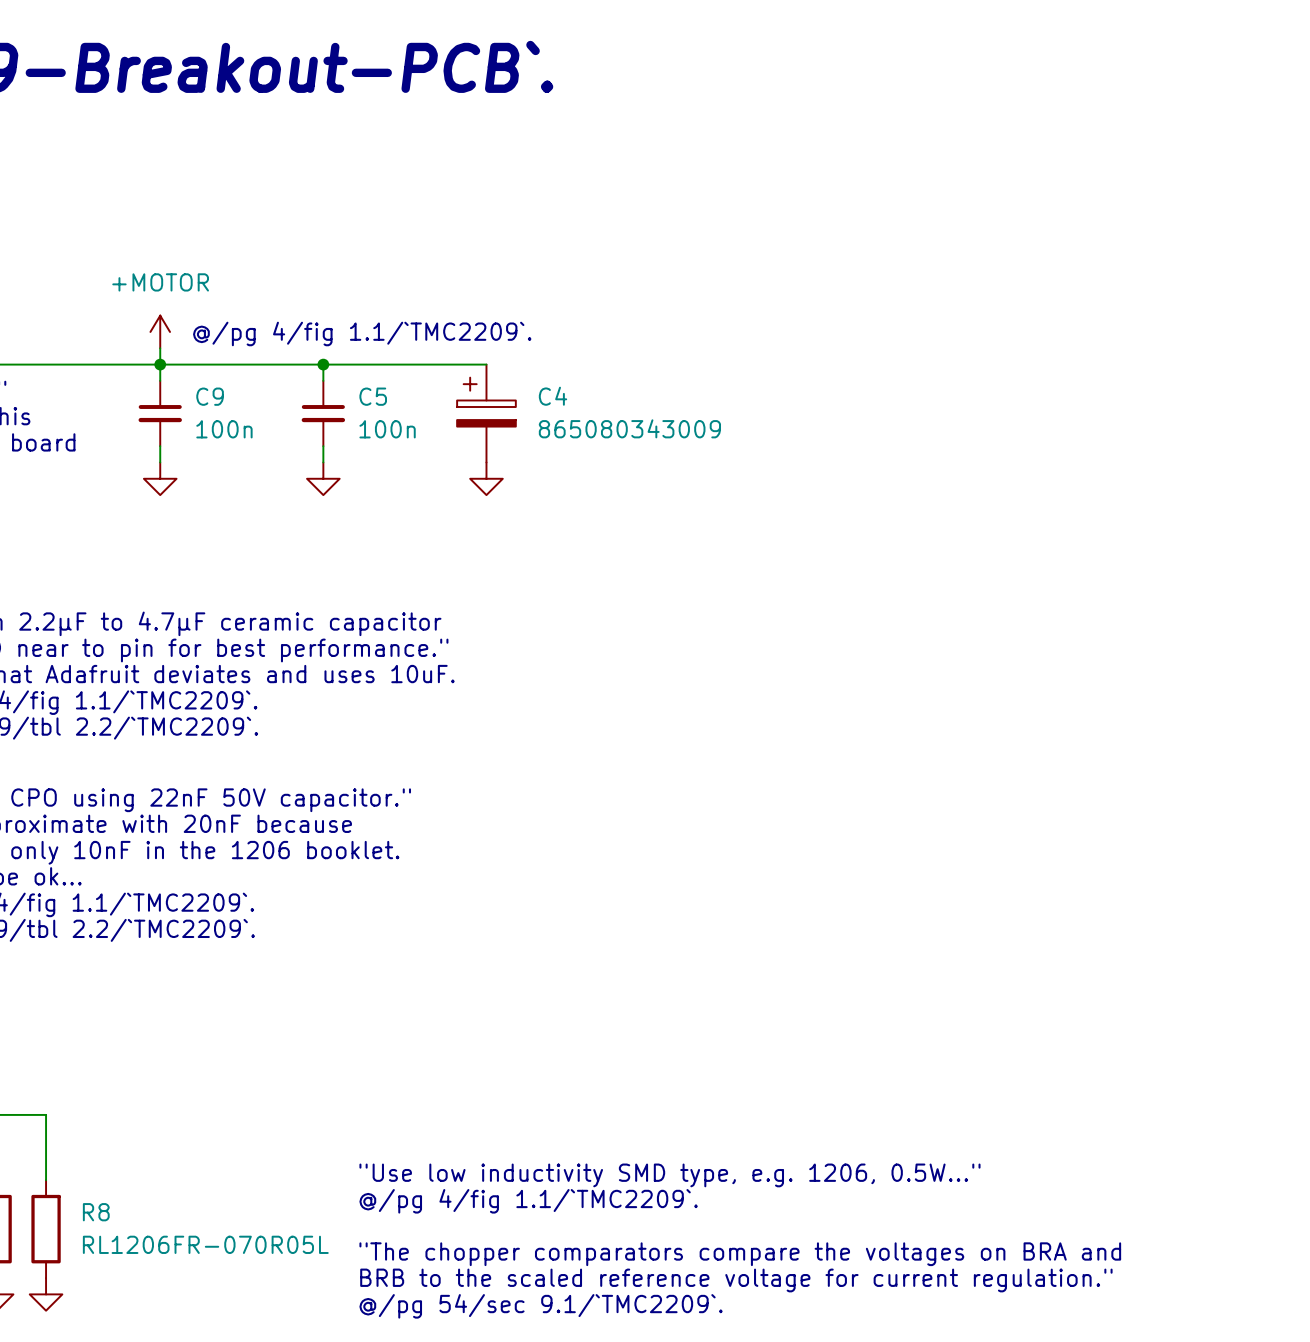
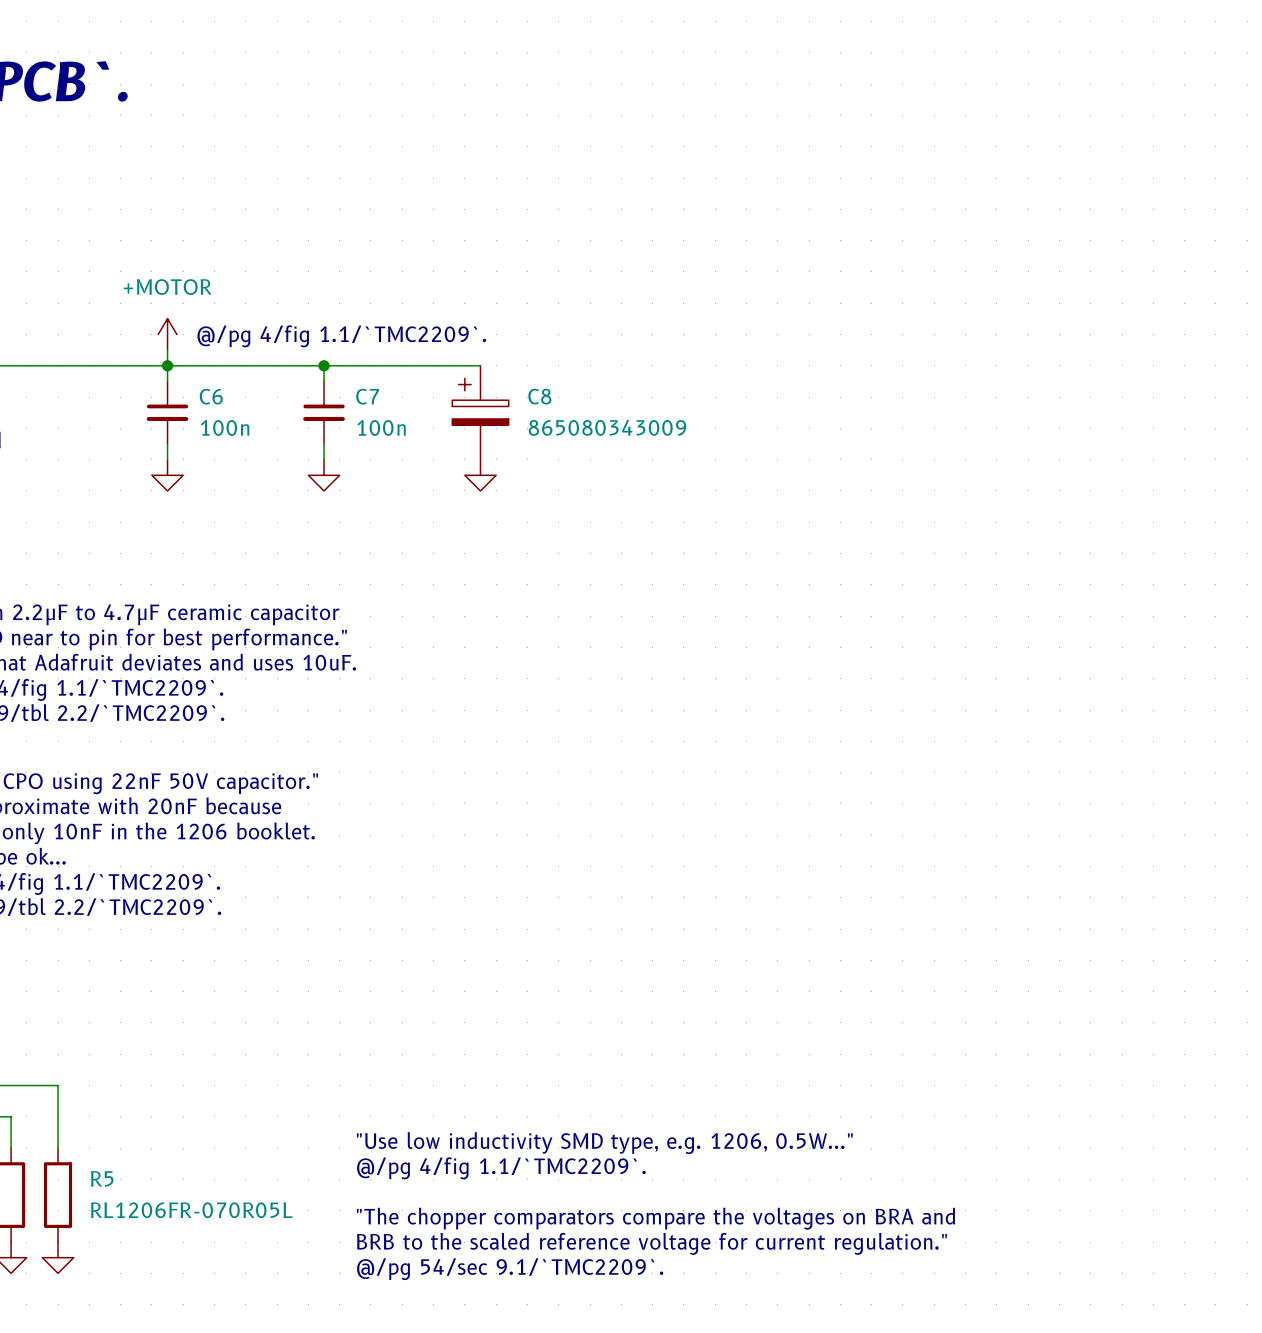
C9 name: C9 (210, 396) -> C6 (211, 396)
C5 name: C5 (373, 396) -> C7 (367, 396)
C4 name: C4 (553, 396) -> C8 (539, 396)
R8 name: R8 (96, 1212) -> R5 (102, 1178)

